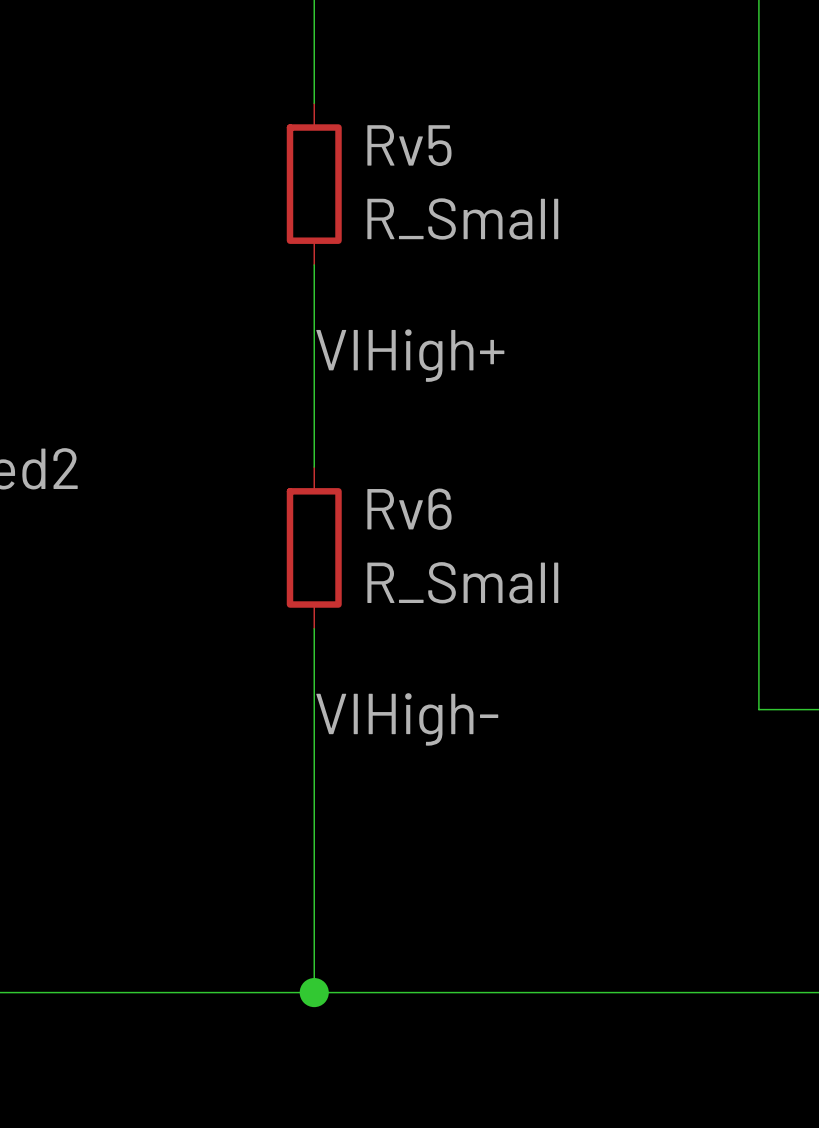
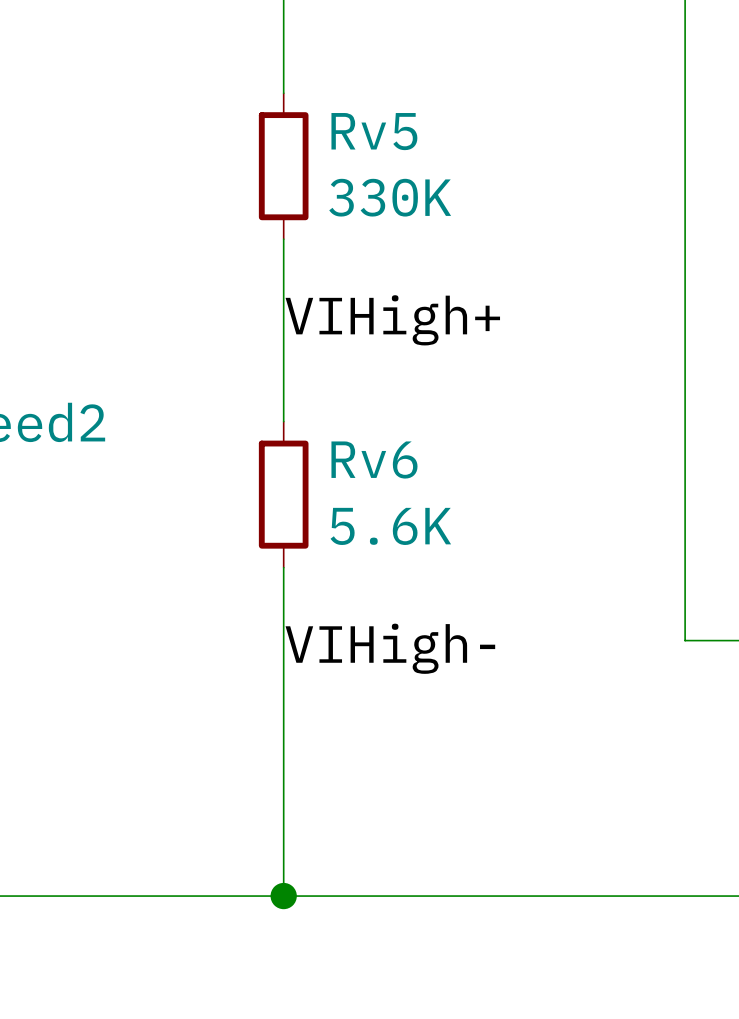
Rv5 value: R_Small (462, 218) -> 330K (390, 197)
Rv6 value: R_Small (462, 582) -> 5.6K (390, 526)

